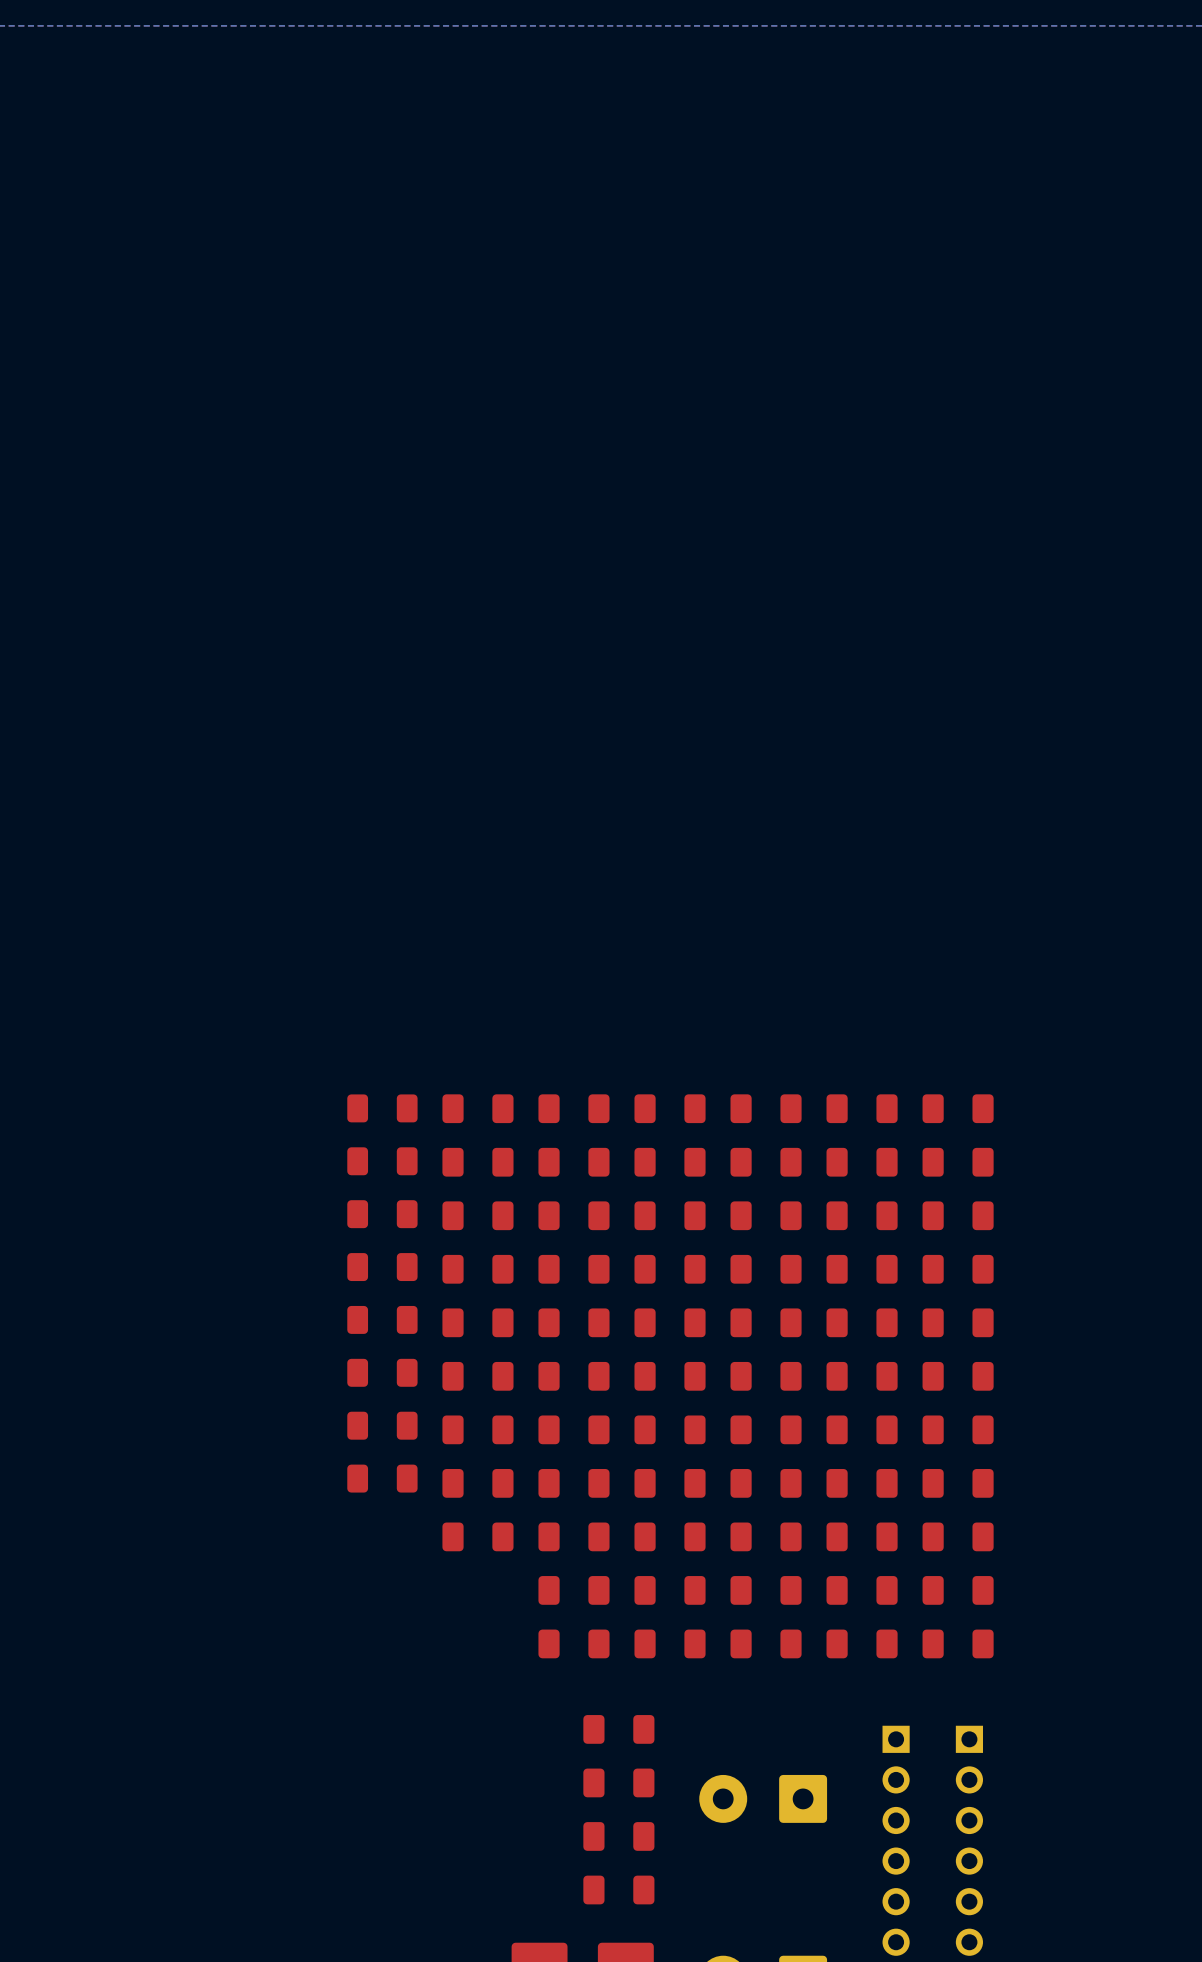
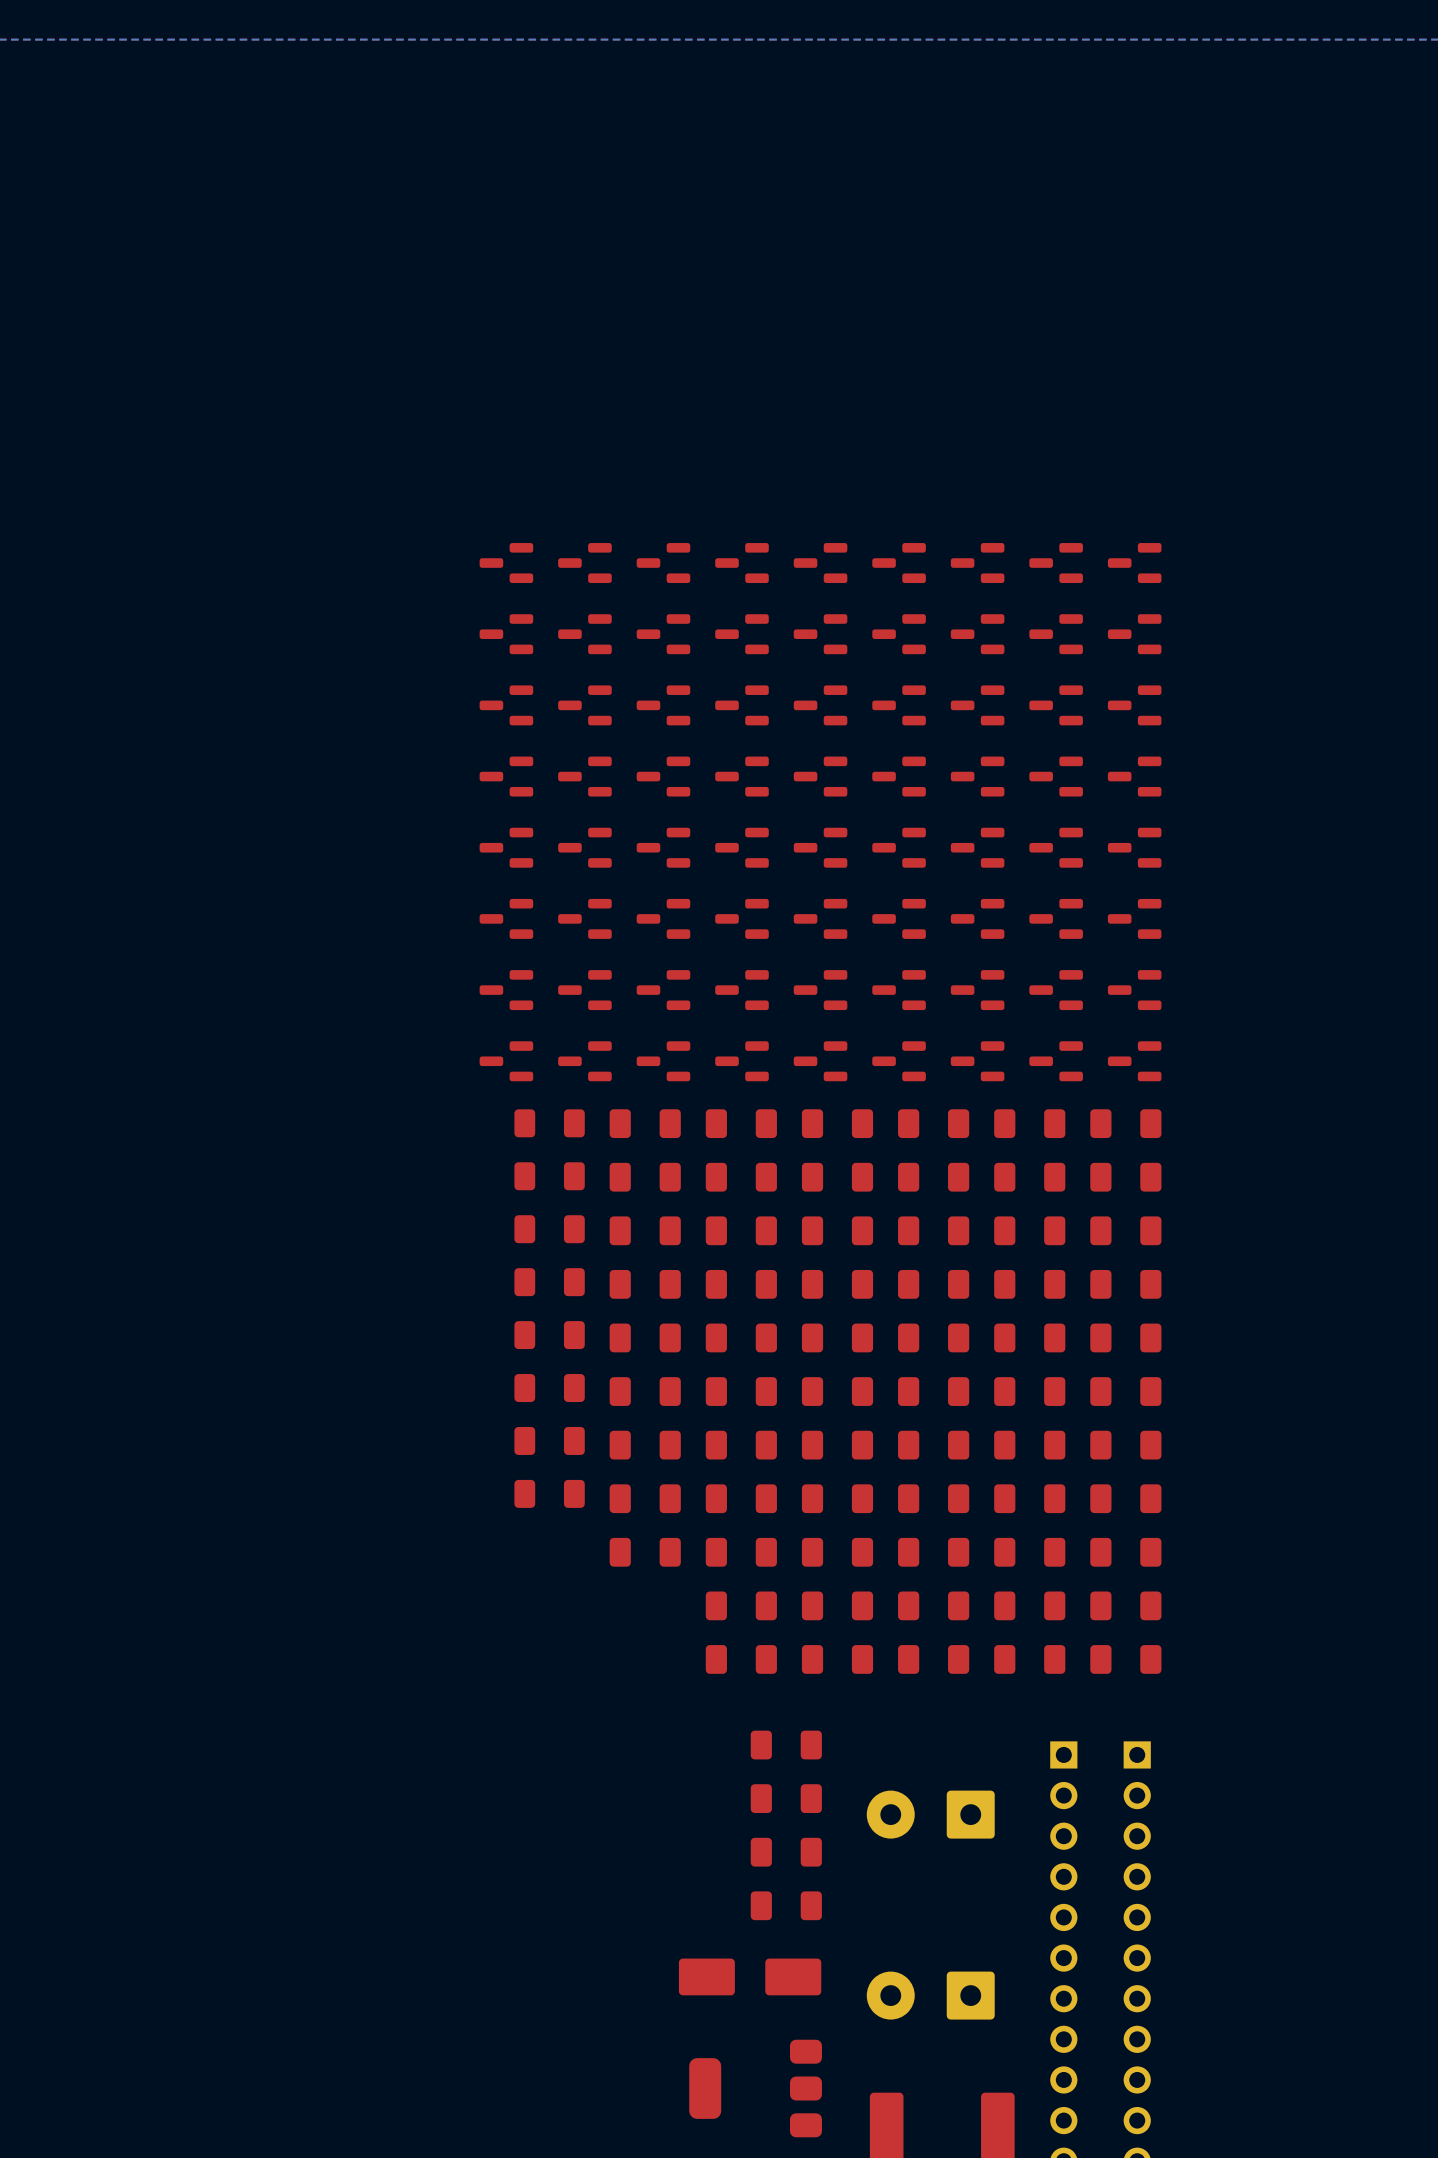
part: none -> (506, 563)
part: none -> (584, 563)
part: none -> (663, 563)
part: none -> (742, 563)
part: none -> (820, 563)
part: none -> (899, 563)
part: none -> (977, 563)
part: none -> (1056, 563)
part: none -> (1134, 563)
part: none -> (506, 634)
part: none -> (584, 634)
part: none -> (663, 634)
part: none -> (742, 634)
part: none -> (820, 634)
part: none -> (899, 634)
part: none -> (977, 634)
part: none -> (1056, 634)
part: none -> (1134, 634)
part: none -> (506, 705)
part: none -> (584, 705)
part: none -> (663, 705)
part: none -> (742, 705)
part: none -> (820, 705)
part: none -> (899, 705)
part: none -> (977, 705)
part: none -> (1056, 705)
part: none -> (1134, 705)
part: none -> (506, 776)
part: none -> (584, 776)
part: none -> (663, 776)
part: none -> (742, 776)
part: none -> (820, 776)
part: none -> (899, 776)
part: none -> (977, 776)
part: none -> (1056, 776)
part: none -> (1134, 776)
part: none -> (506, 847)
part: none -> (584, 847)
part: none -> (663, 847)
part: none -> (742, 847)
part: none -> (820, 847)
part: none -> (899, 847)
part: none -> (977, 847)
part: none -> (1056, 847)
part: none -> (1134, 847)
part: none -> (506, 918)
part: none -> (584, 918)
part: none -> (663, 918)
part: none -> (742, 918)
part: none -> (820, 918)
part: none -> (899, 918)
part: none -> (977, 918)
part: none -> (1056, 918)
part: none -> (1134, 918)
part: none -> (506, 990)
part: none -> (584, 990)
part: none -> (663, 990)
part: none -> (742, 990)
part: none -> (820, 990)
part: none -> (899, 990)
part: none -> (977, 990)
part: none -> (1056, 990)
part: none -> (1134, 990)
part: none -> (506, 1061)
part: none -> (584, 1061)
part: none -> (663, 1061)
part: none -> (742, 1061)
part: none -> (820, 1061)
part: none -> (899, 1061)
part: none -> (977, 1061)
part: none -> (1056, 1061)
part: none -> (1134, 1061)

